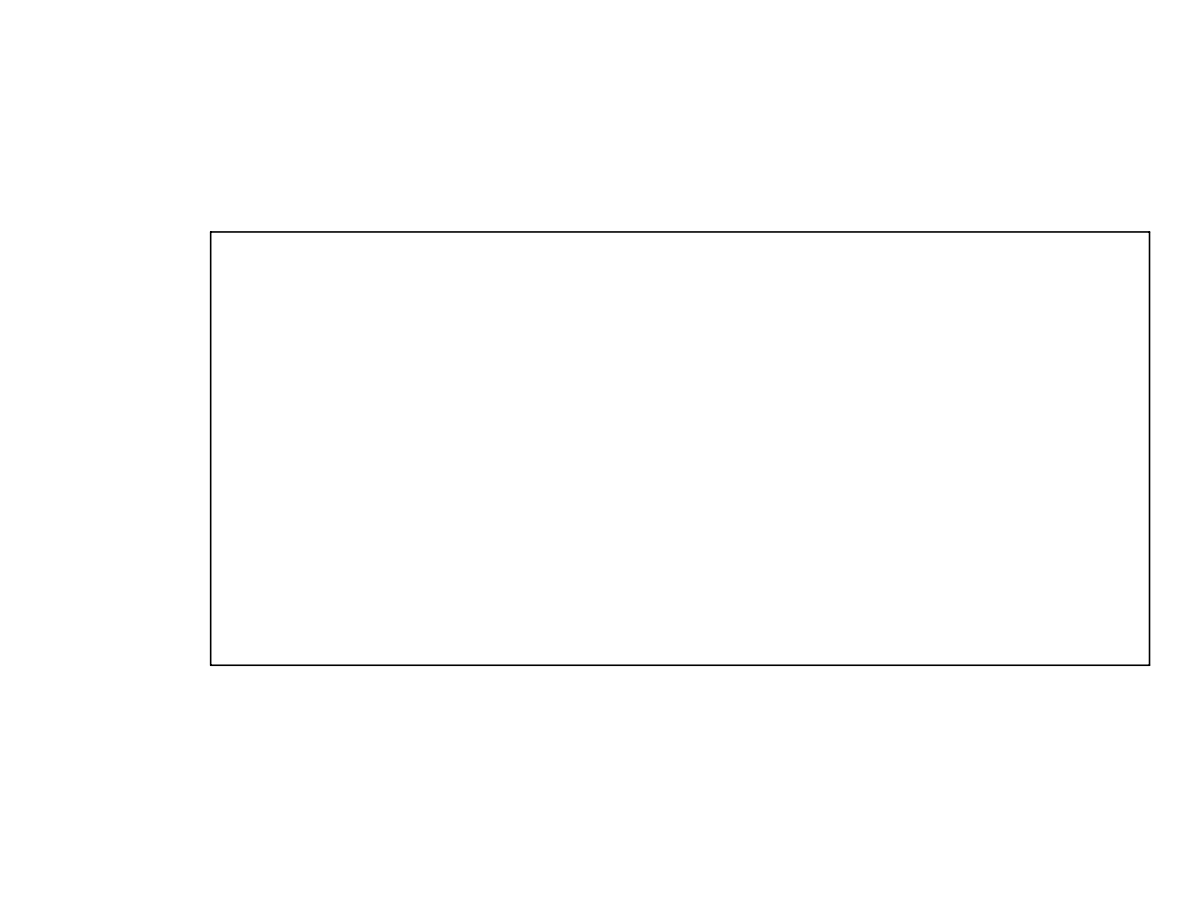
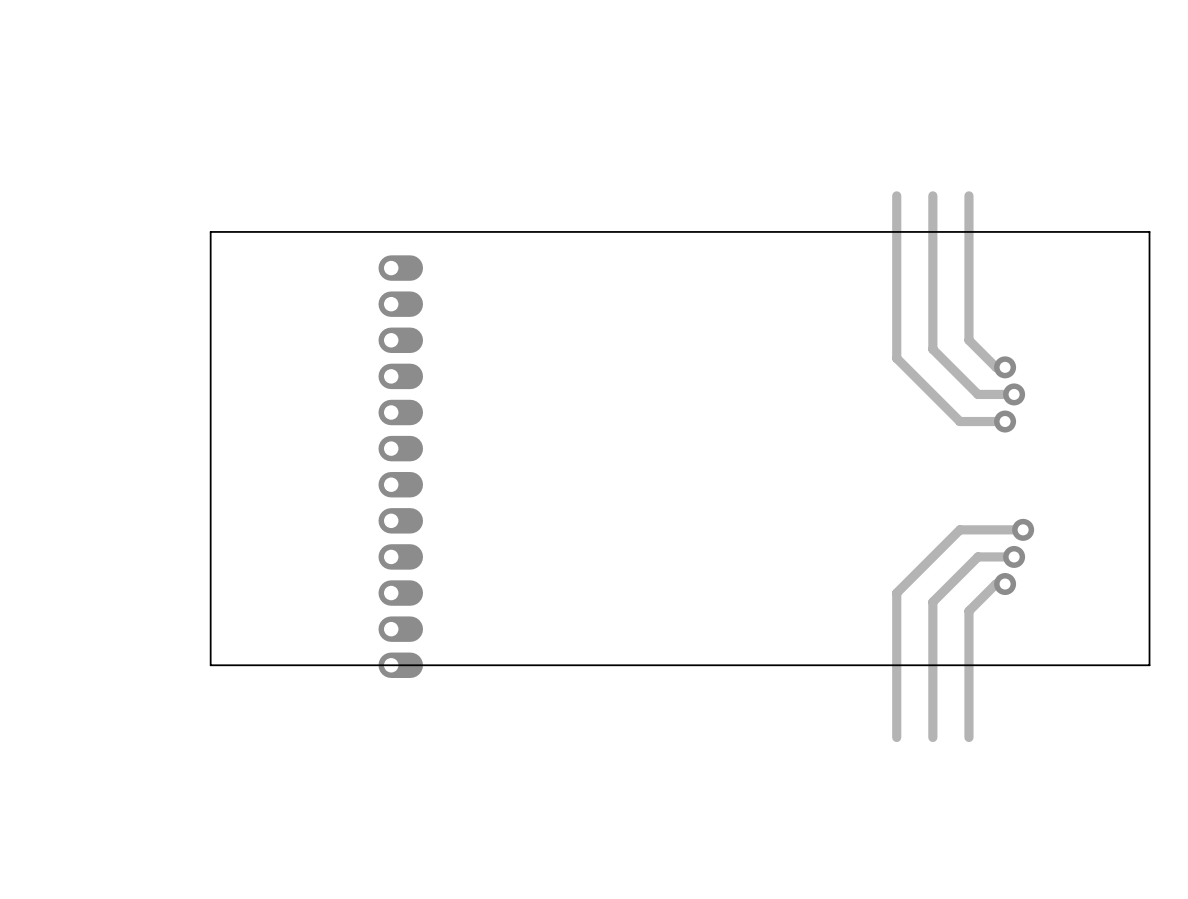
track: none -> (896, 195) (896, 358) (959, 421) (1005, 421)
track: none -> (932, 195) (932, 349) (977, 394) (1014, 394)
track: none -> (968, 195) (968, 340) (996, 367) (1005, 367)
via: none -> (1005, 367)
via: none -> (1014, 394)
via: none -> (1005, 421)
part: none -> (400, 466)
track: none -> (1023, 529) (959, 529) (896, 593) (896, 737)
via: none -> (1023, 529)
track: none -> (1014, 556) (977, 556) (932, 602) (932, 737)
via: none -> (1014, 556)
track: none -> (1005, 584) (996, 584) (968, 611) (968, 737)
via: none -> (1005, 584)

